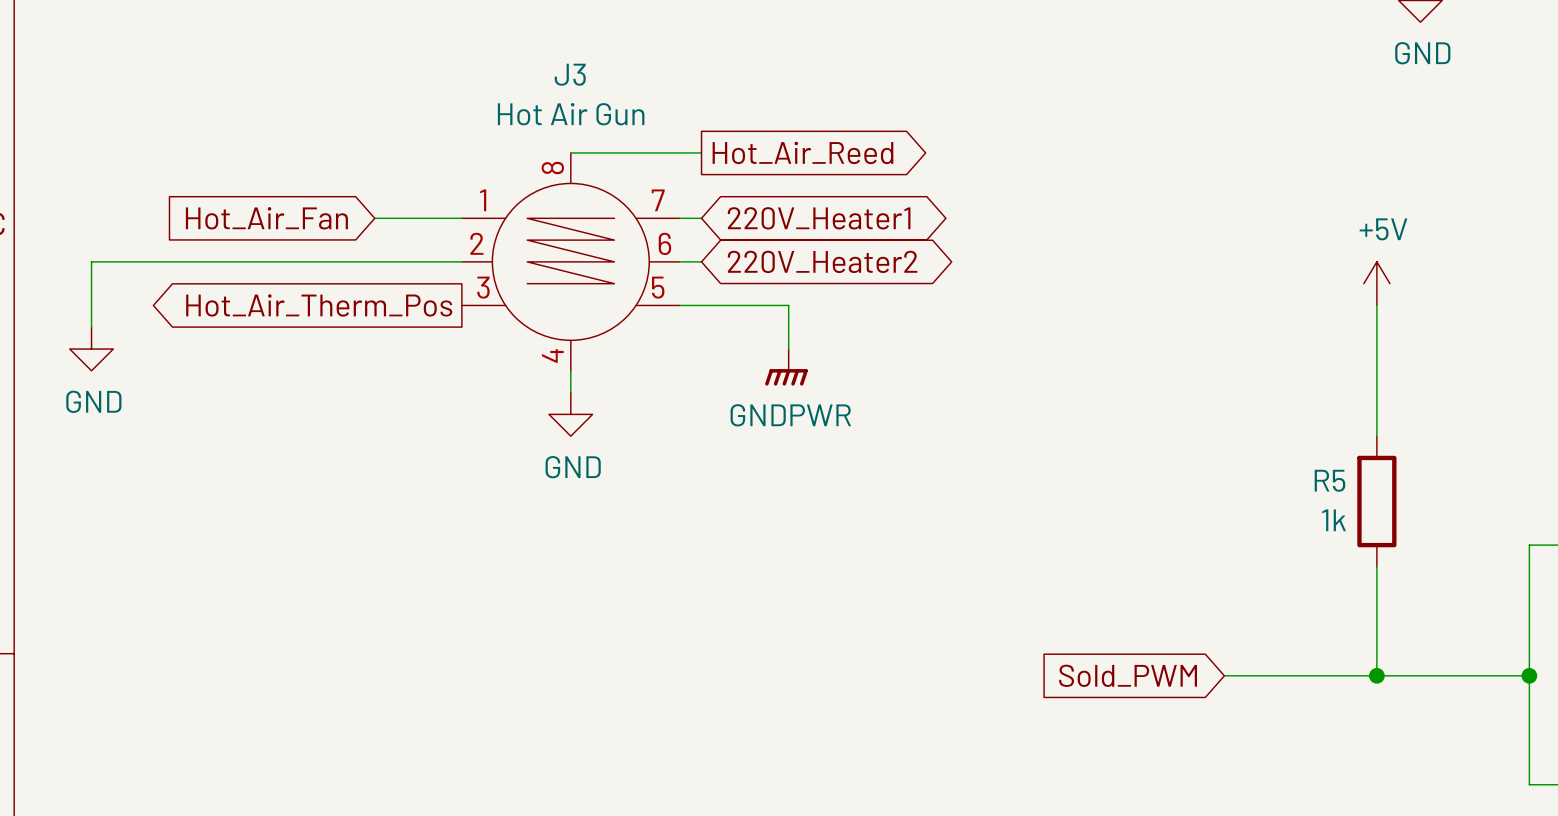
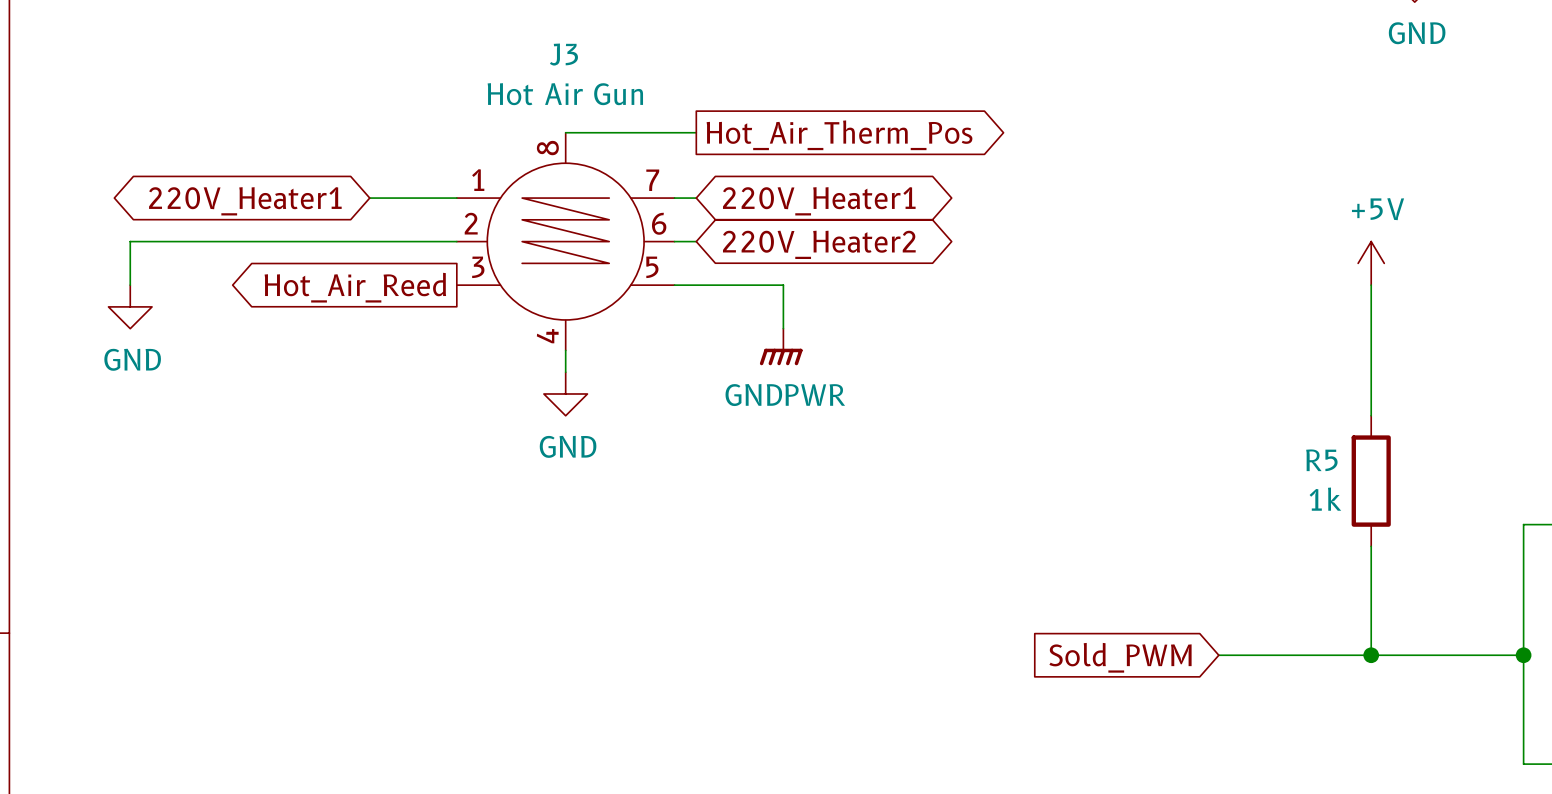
global label: Hot_Air_Reed (802, 152) -> Hot_Air_Therm_Pos (839, 135)
global label shape: input (266, 218) -> bidirectional (245, 201)
global label: Hot_Air_Fan (266, 218) -> 220V_Heater1 (245, 201)
wire: (135, 261) (91, 261) (91, 327) -> (130, 241) (130, 285)
global label: Hot_Air_Therm_Pos (319, 305) -> Hot_Air_Reed (355, 287)
power symbol position: GND (91, 349) -> GND (130, 306)

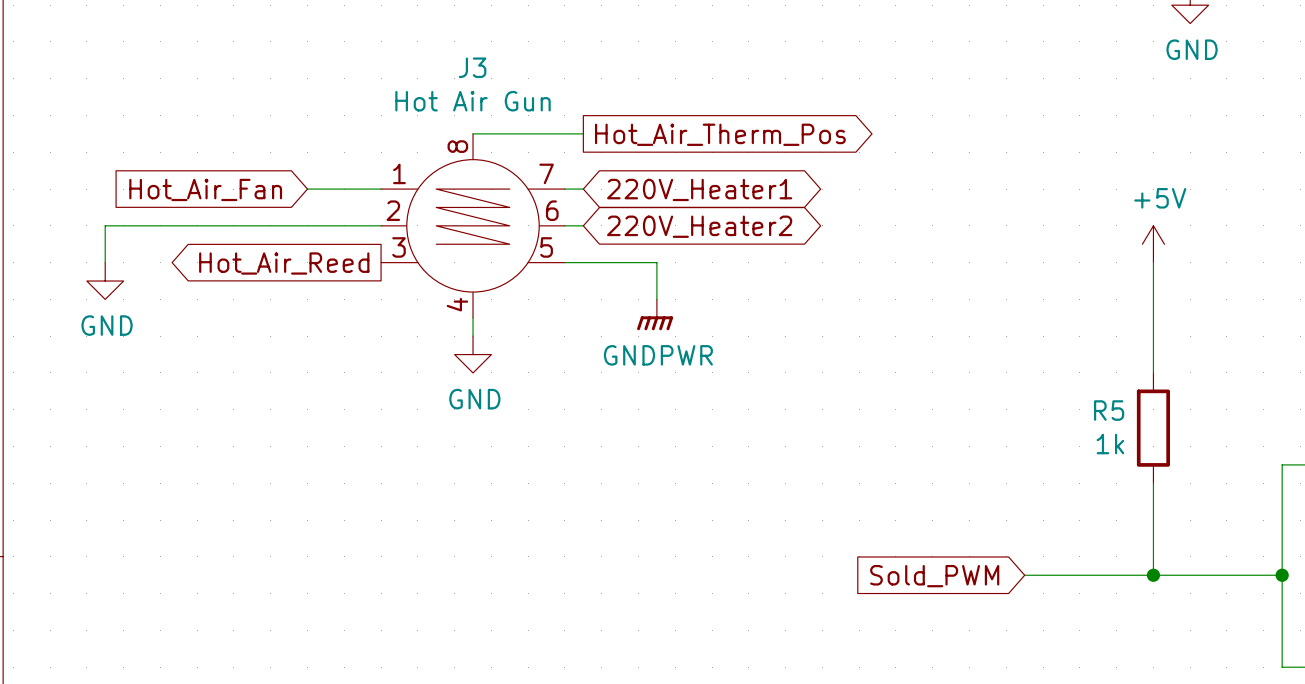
global label shape: bidirectional (245, 201) -> input (205, 189)
global label: 220V_Heater1 (245, 201) -> Hot_Air_Fan (205, 189)

